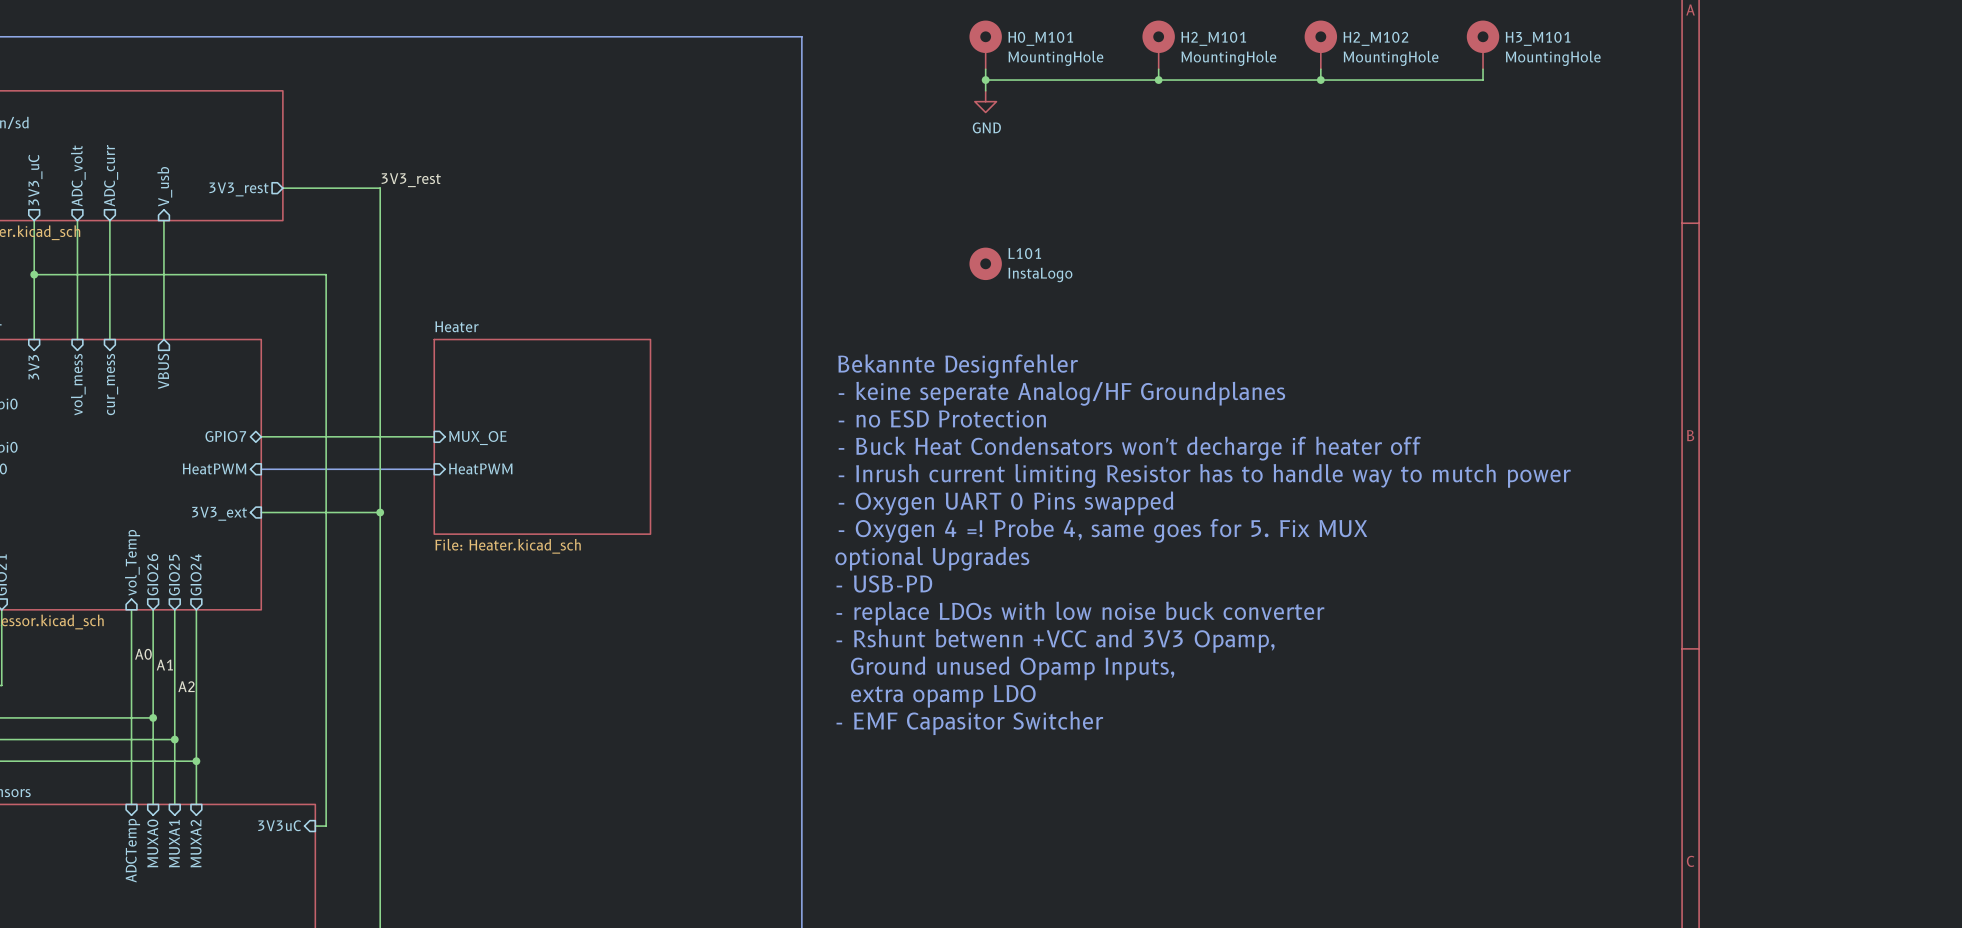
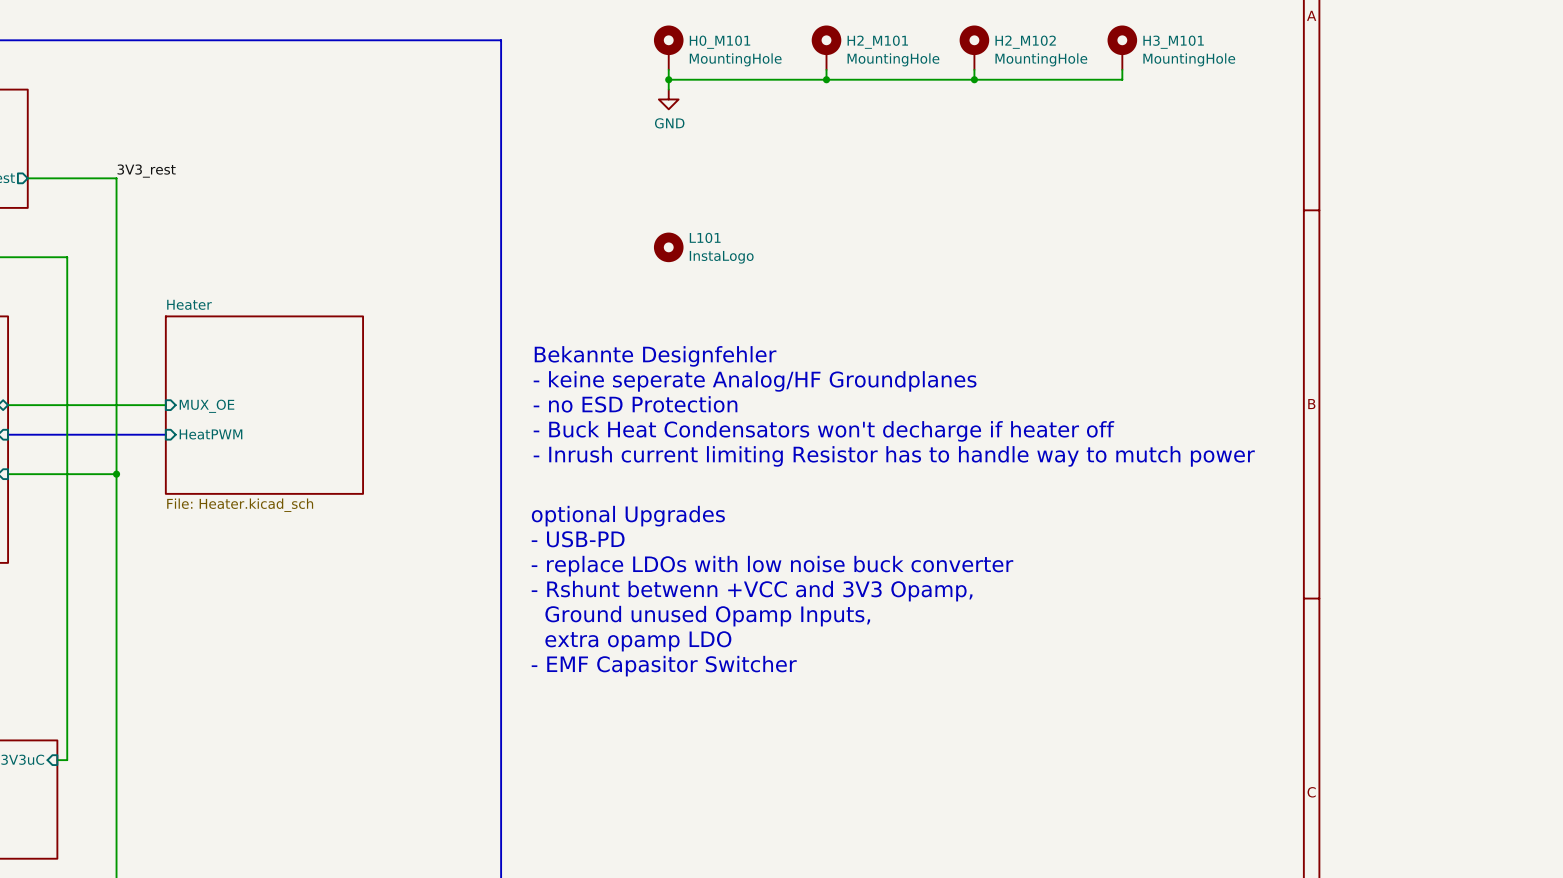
text position: Bekannte Designfehler (958, 366) -> Bekannte Designfehler (655, 356)
text position: - keine seperate Analog/HF Groundplanes (1061, 393) -> - keine seperate Analog/HF Groundplanes (755, 381)
text position: - no ESD Protection (942, 418) -> - no ESD Protection (635, 404)
text position: - Buck Heat Condensators won't decharge if heater off (1129, 448) -> - Buck Heat Condensators won't decharge if heater off (823, 431)
text position: - Inrush current limiting Resistor has to handle way to mutch power (1204, 476) -> - Inrush current limiting Resistor has to handle way to mutch power (894, 456)
text: - Oxygen UART 0 Pins swapped (1006, 503) -> none
text: - Oxygen 4 =! Probe 4, same goes for 5. Fix MUX (1102, 530) -> none

